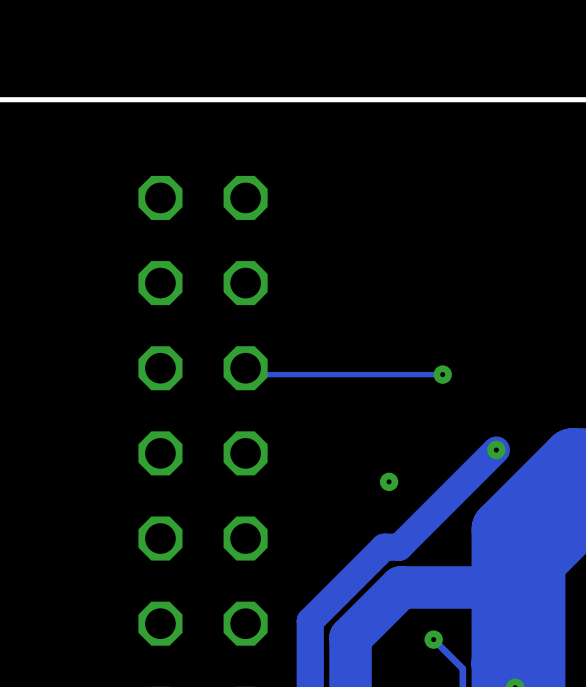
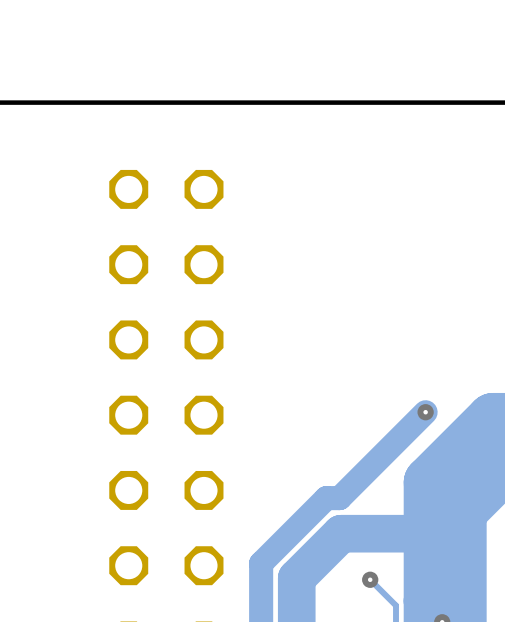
track: (245, 368) (251, 374) (442, 374) -> none
via: (442, 374) -> none
via: (389, 481) -> none

